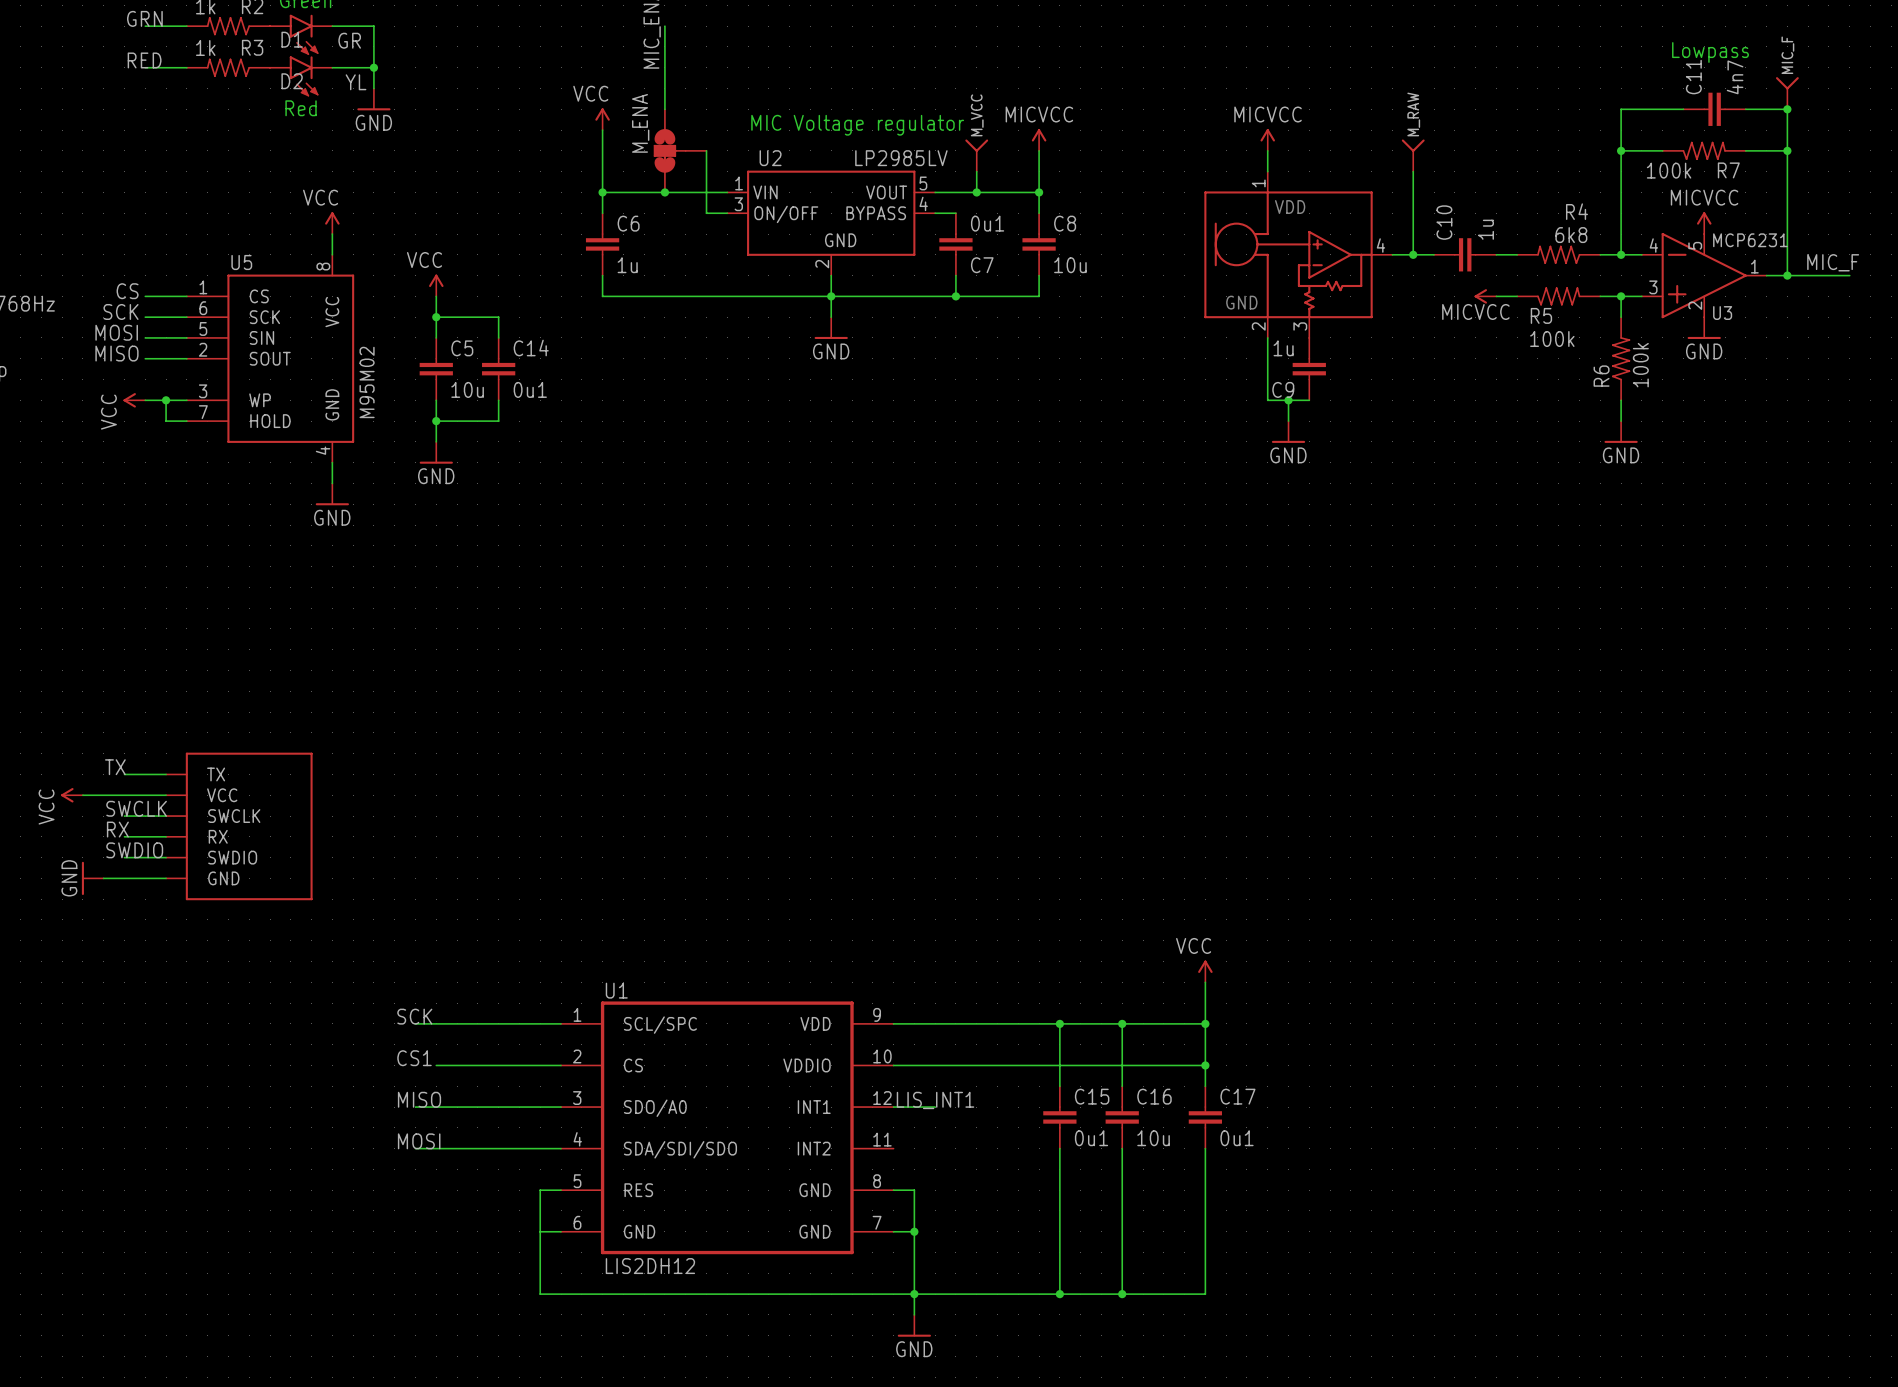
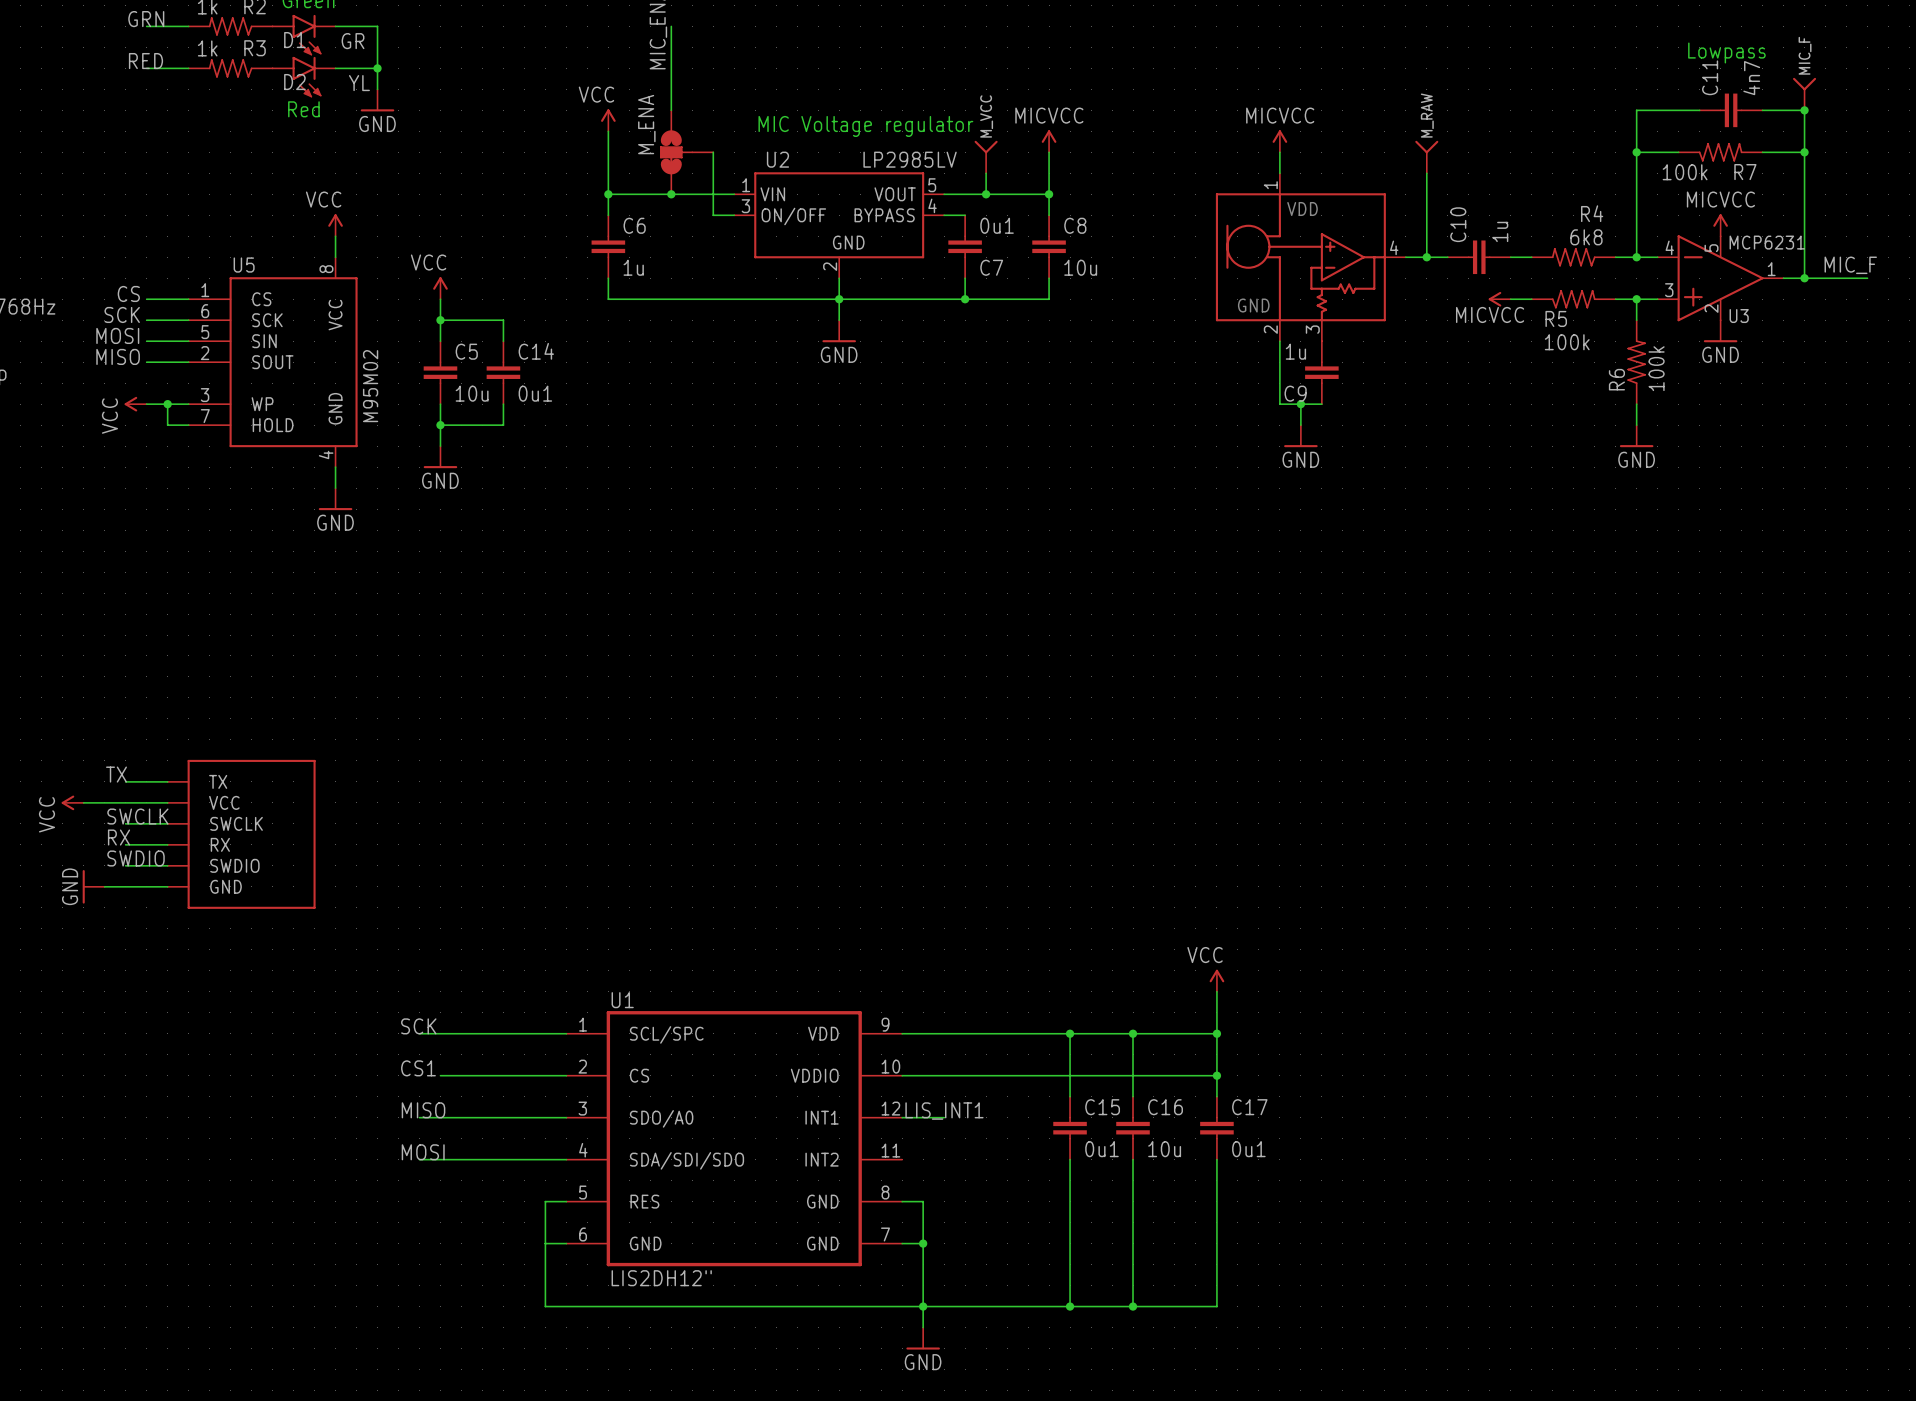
U1 value: LIS2DH12 (650, 1266) -> LIS2DH12" (661, 1278)

